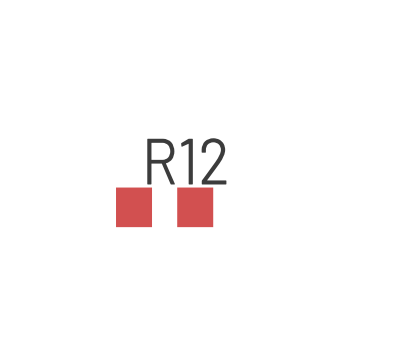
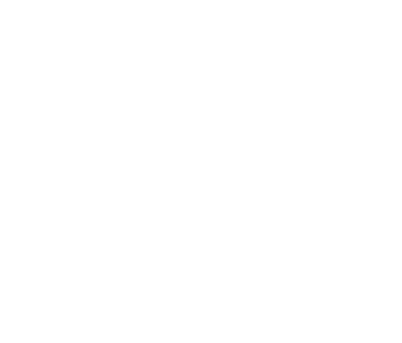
R12: (164, 207) -> none

